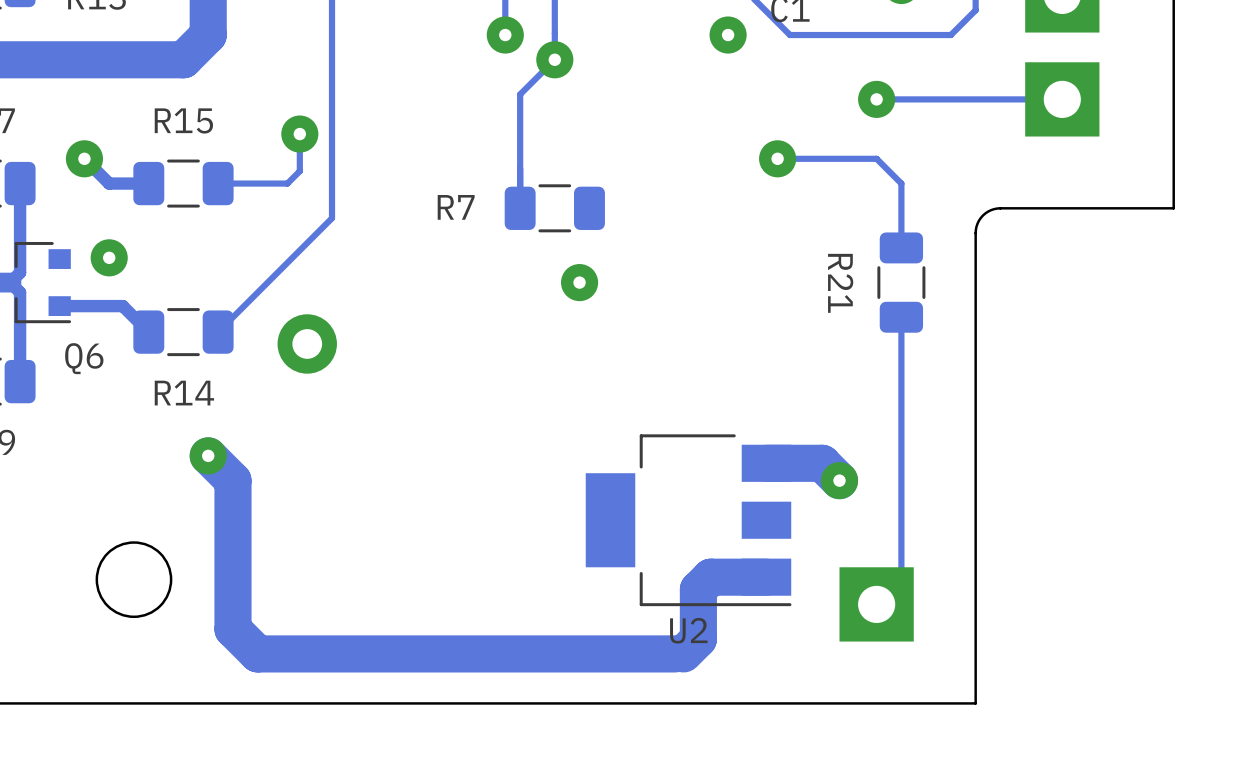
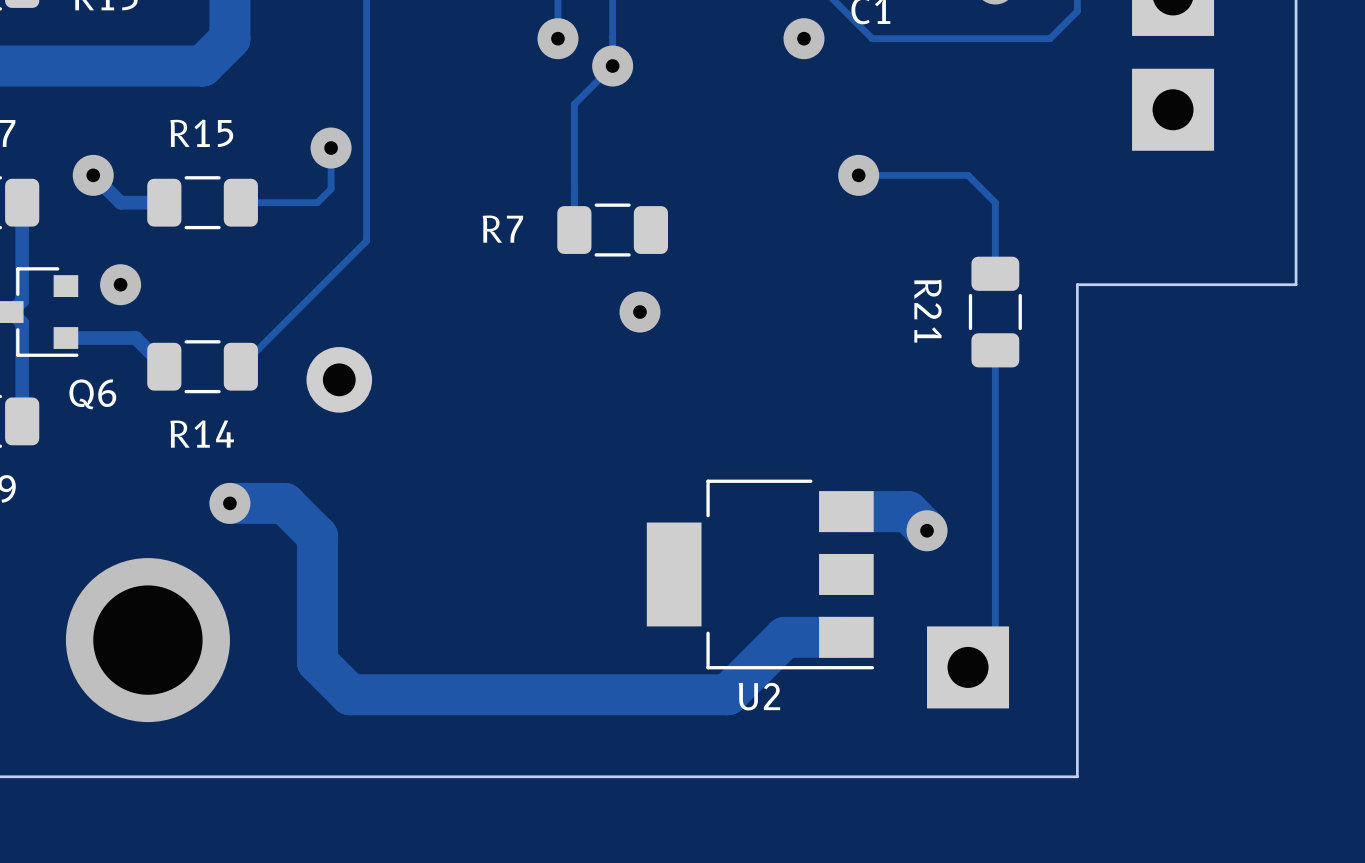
via: (876, 99) -> none
track: (1062, 99) (876, 99) -> none
board edge: (1173, 208) (994, 209) (982, 215) (977, 223) (975, 257) -> (1296, 230) (1296, 284) (1077, 284)
track: (208, 455) (232, 480) (232, 629) (257, 653) (683, 653) (698, 639) (698, 589) -> (229, 503) (284, 503) (317, 536) (317, 661) (350, 694) (727, 694) (771, 651)
round board edge: [95, 541, 173, 619] -> none
via: none -> (147, 640)

